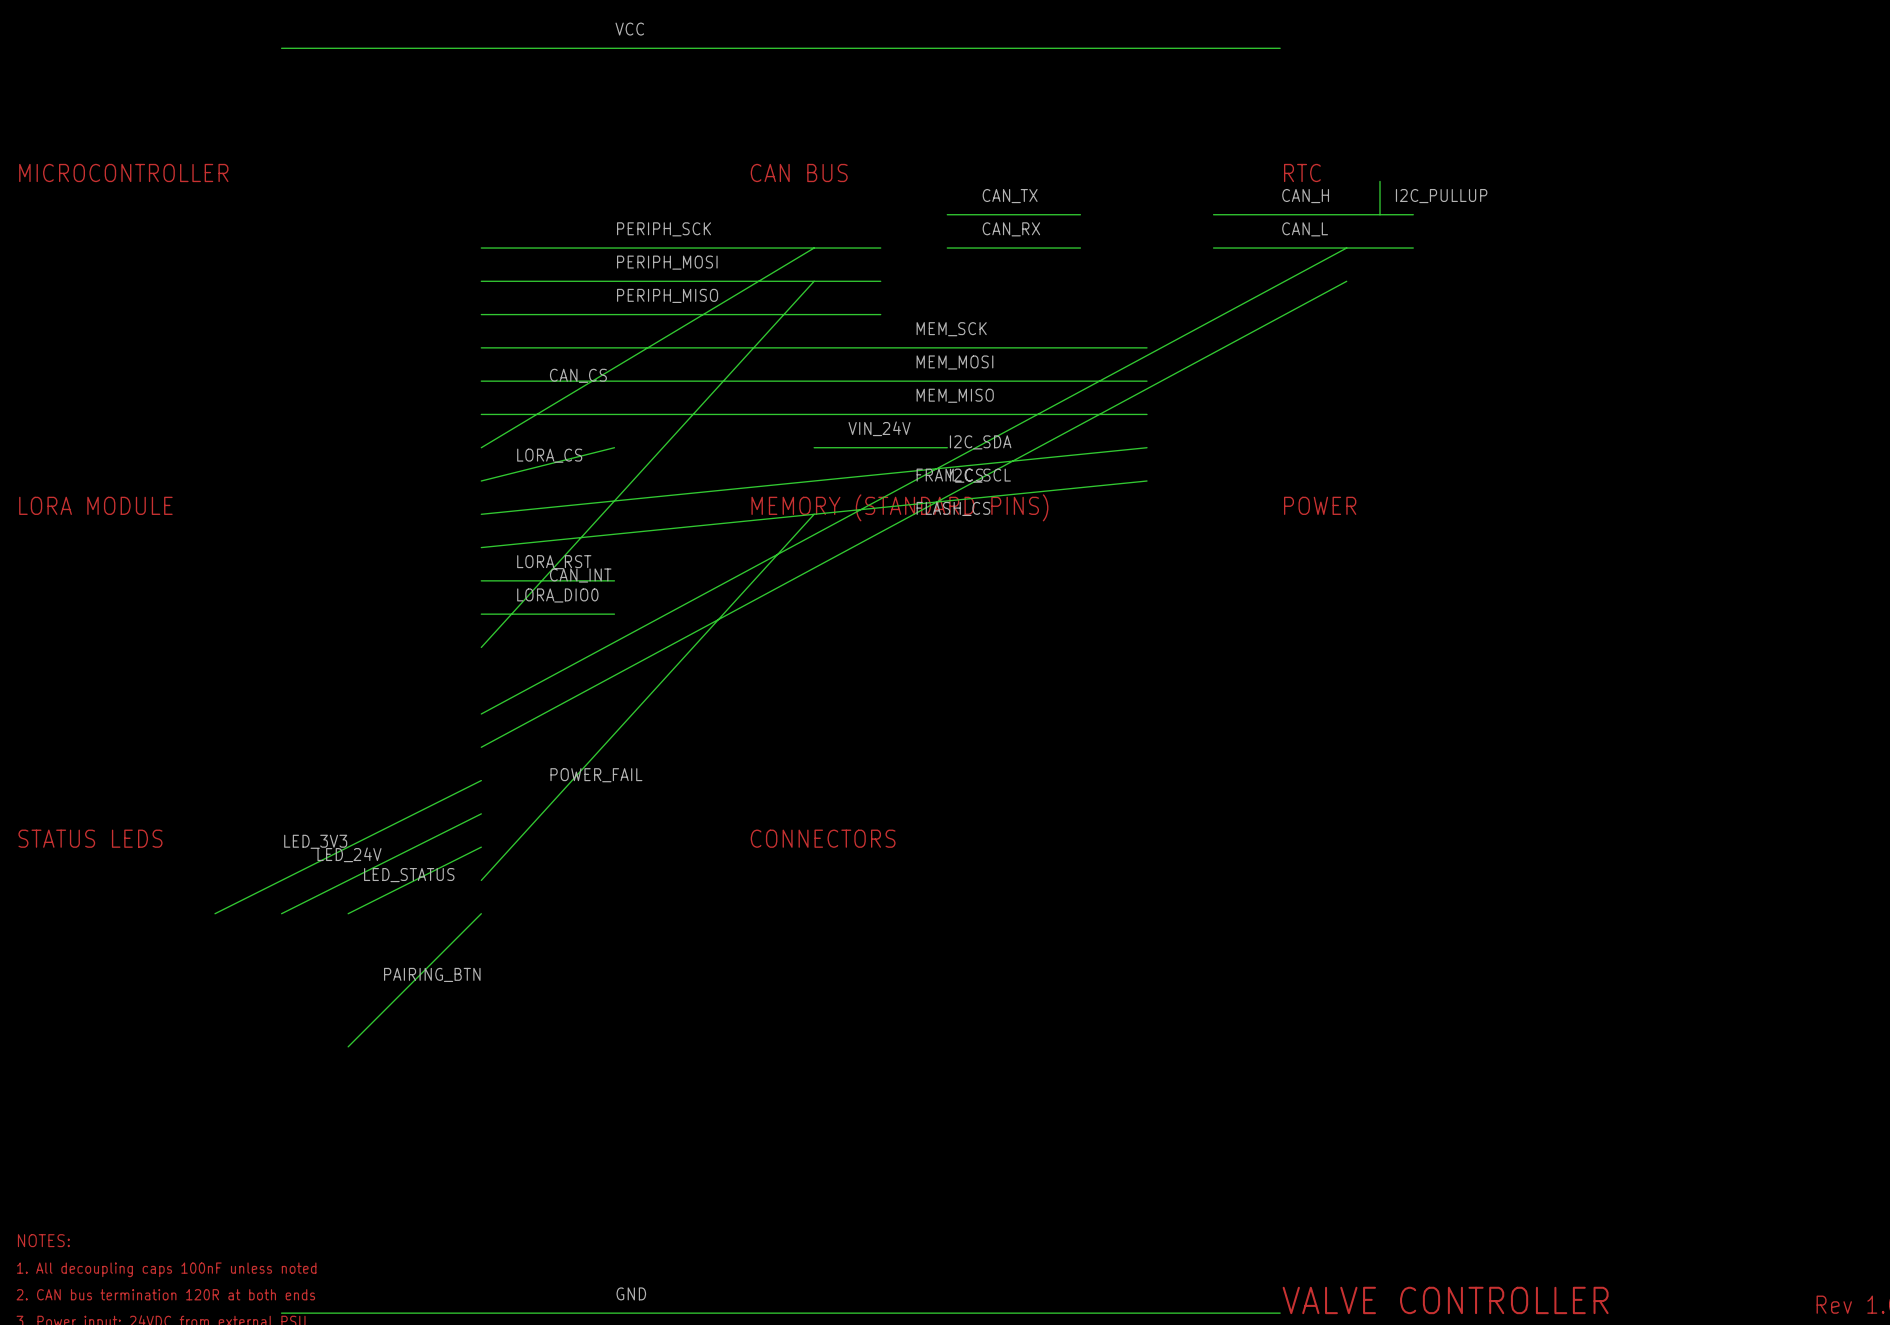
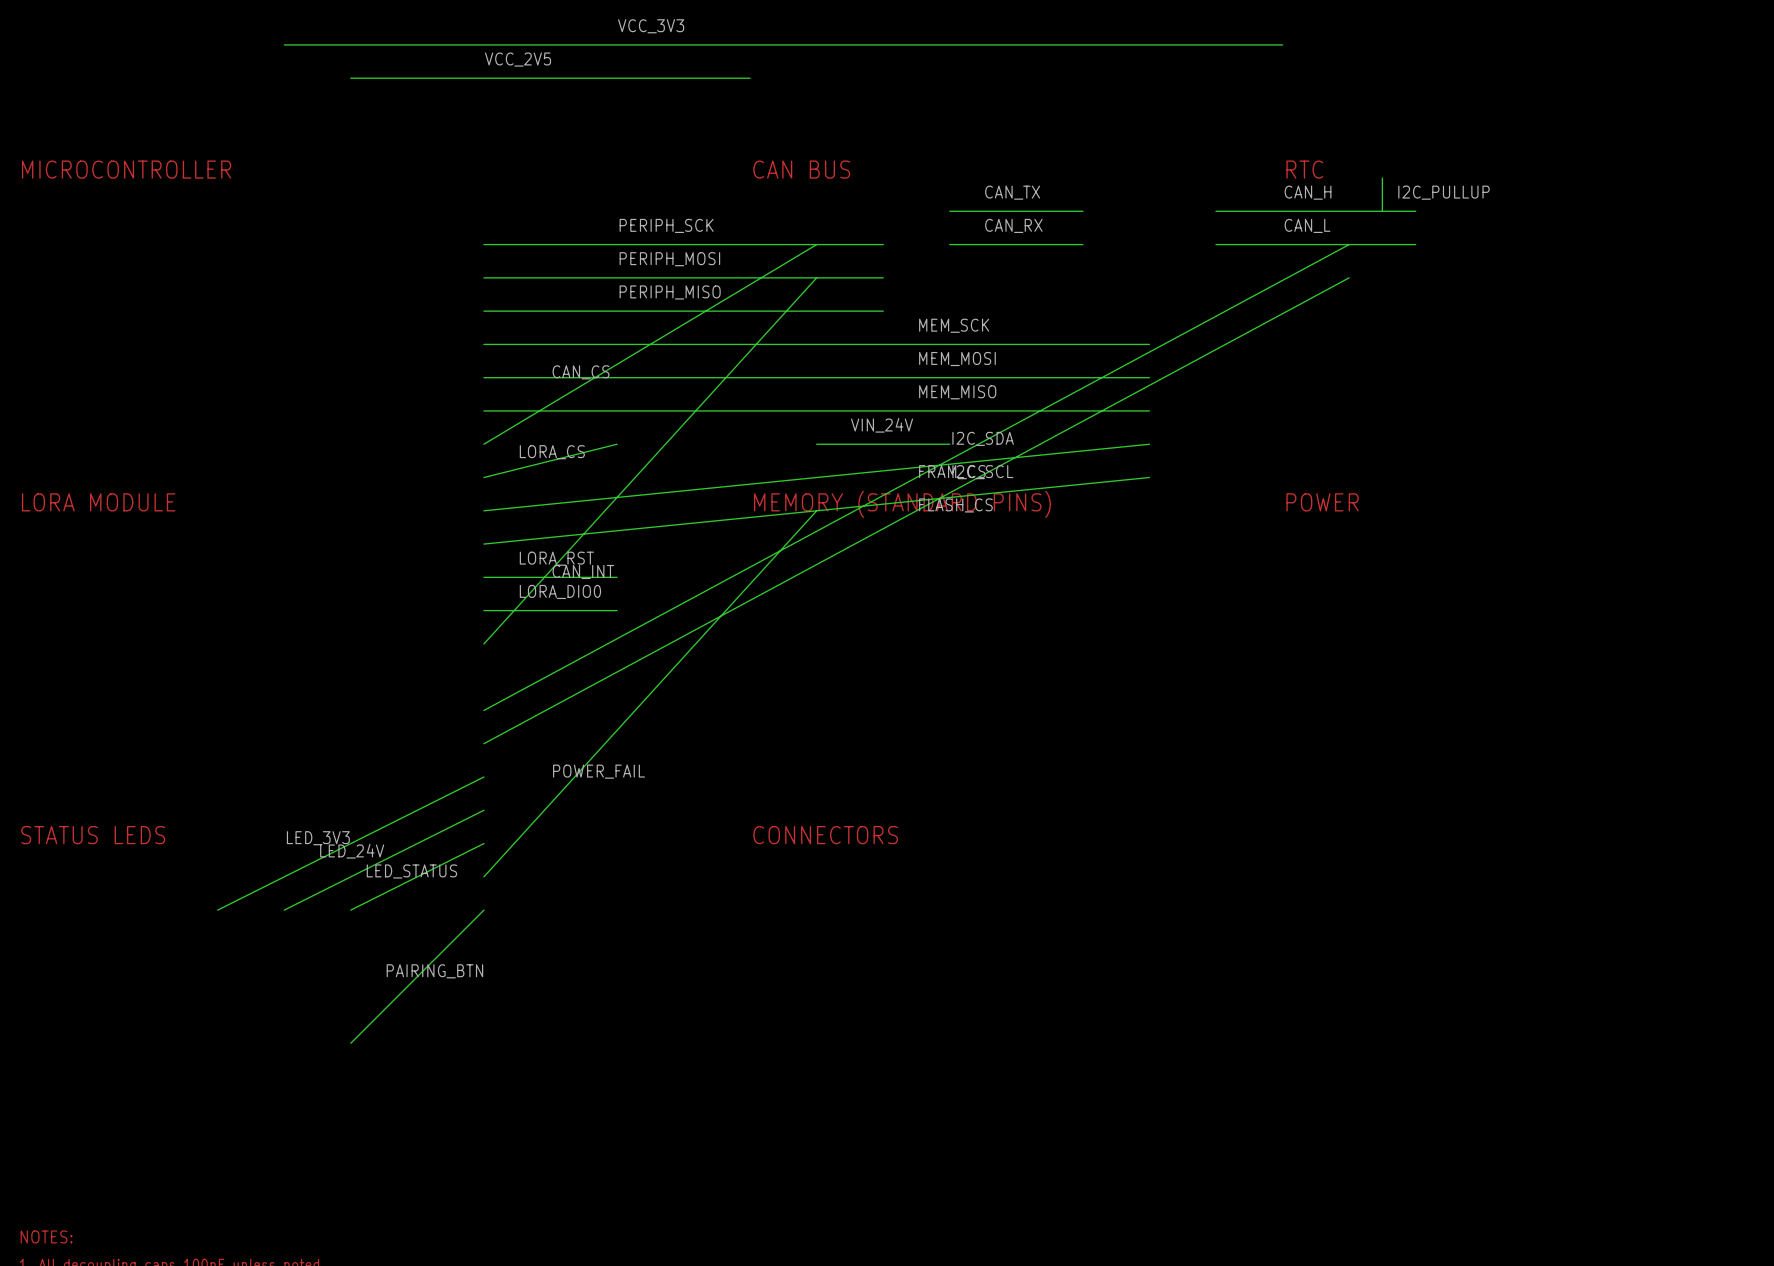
label: VCC (629, 29) -> VCC_3V3 (651, 26)
label: none -> VCC_2V5 (518, 59)
wire: none -> (350, 78) (750, 78)

